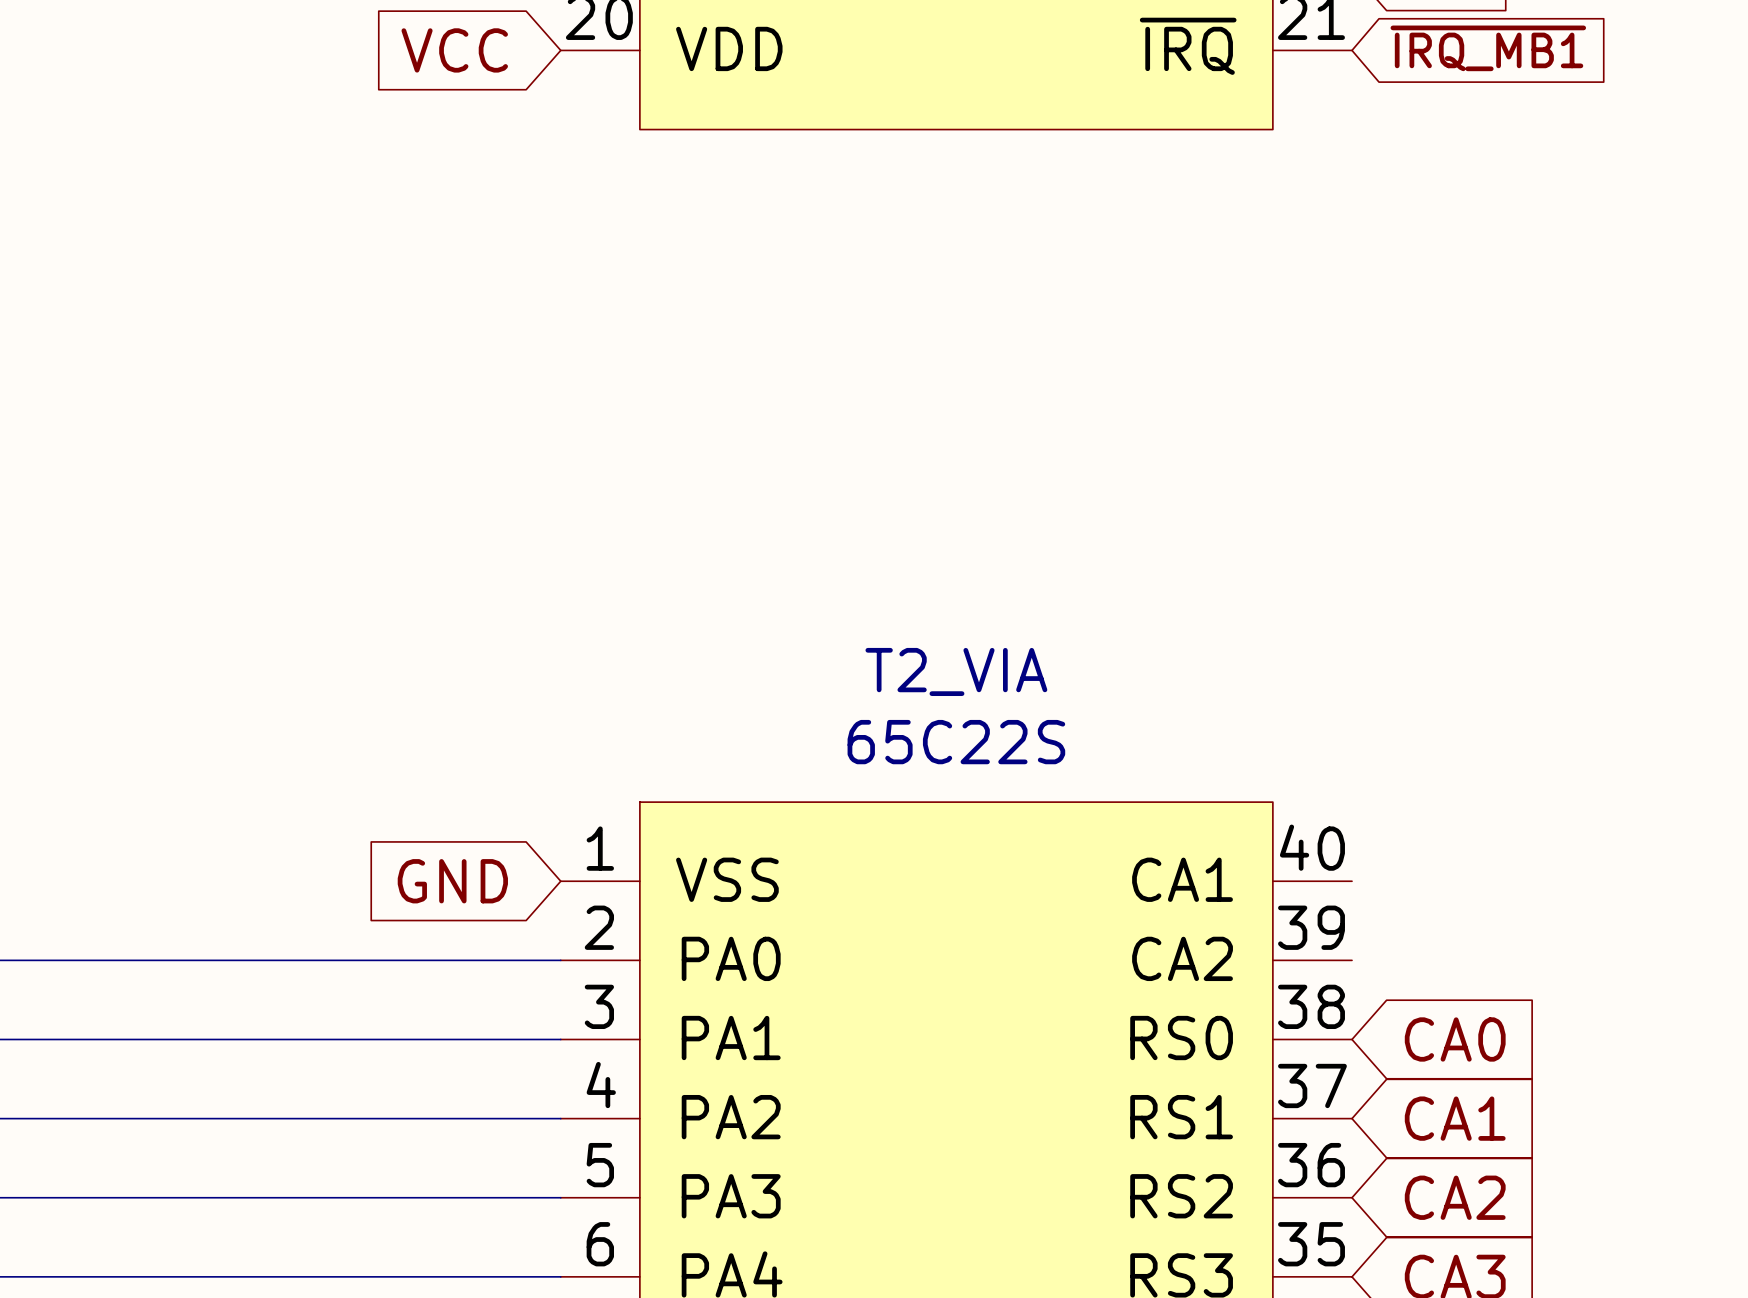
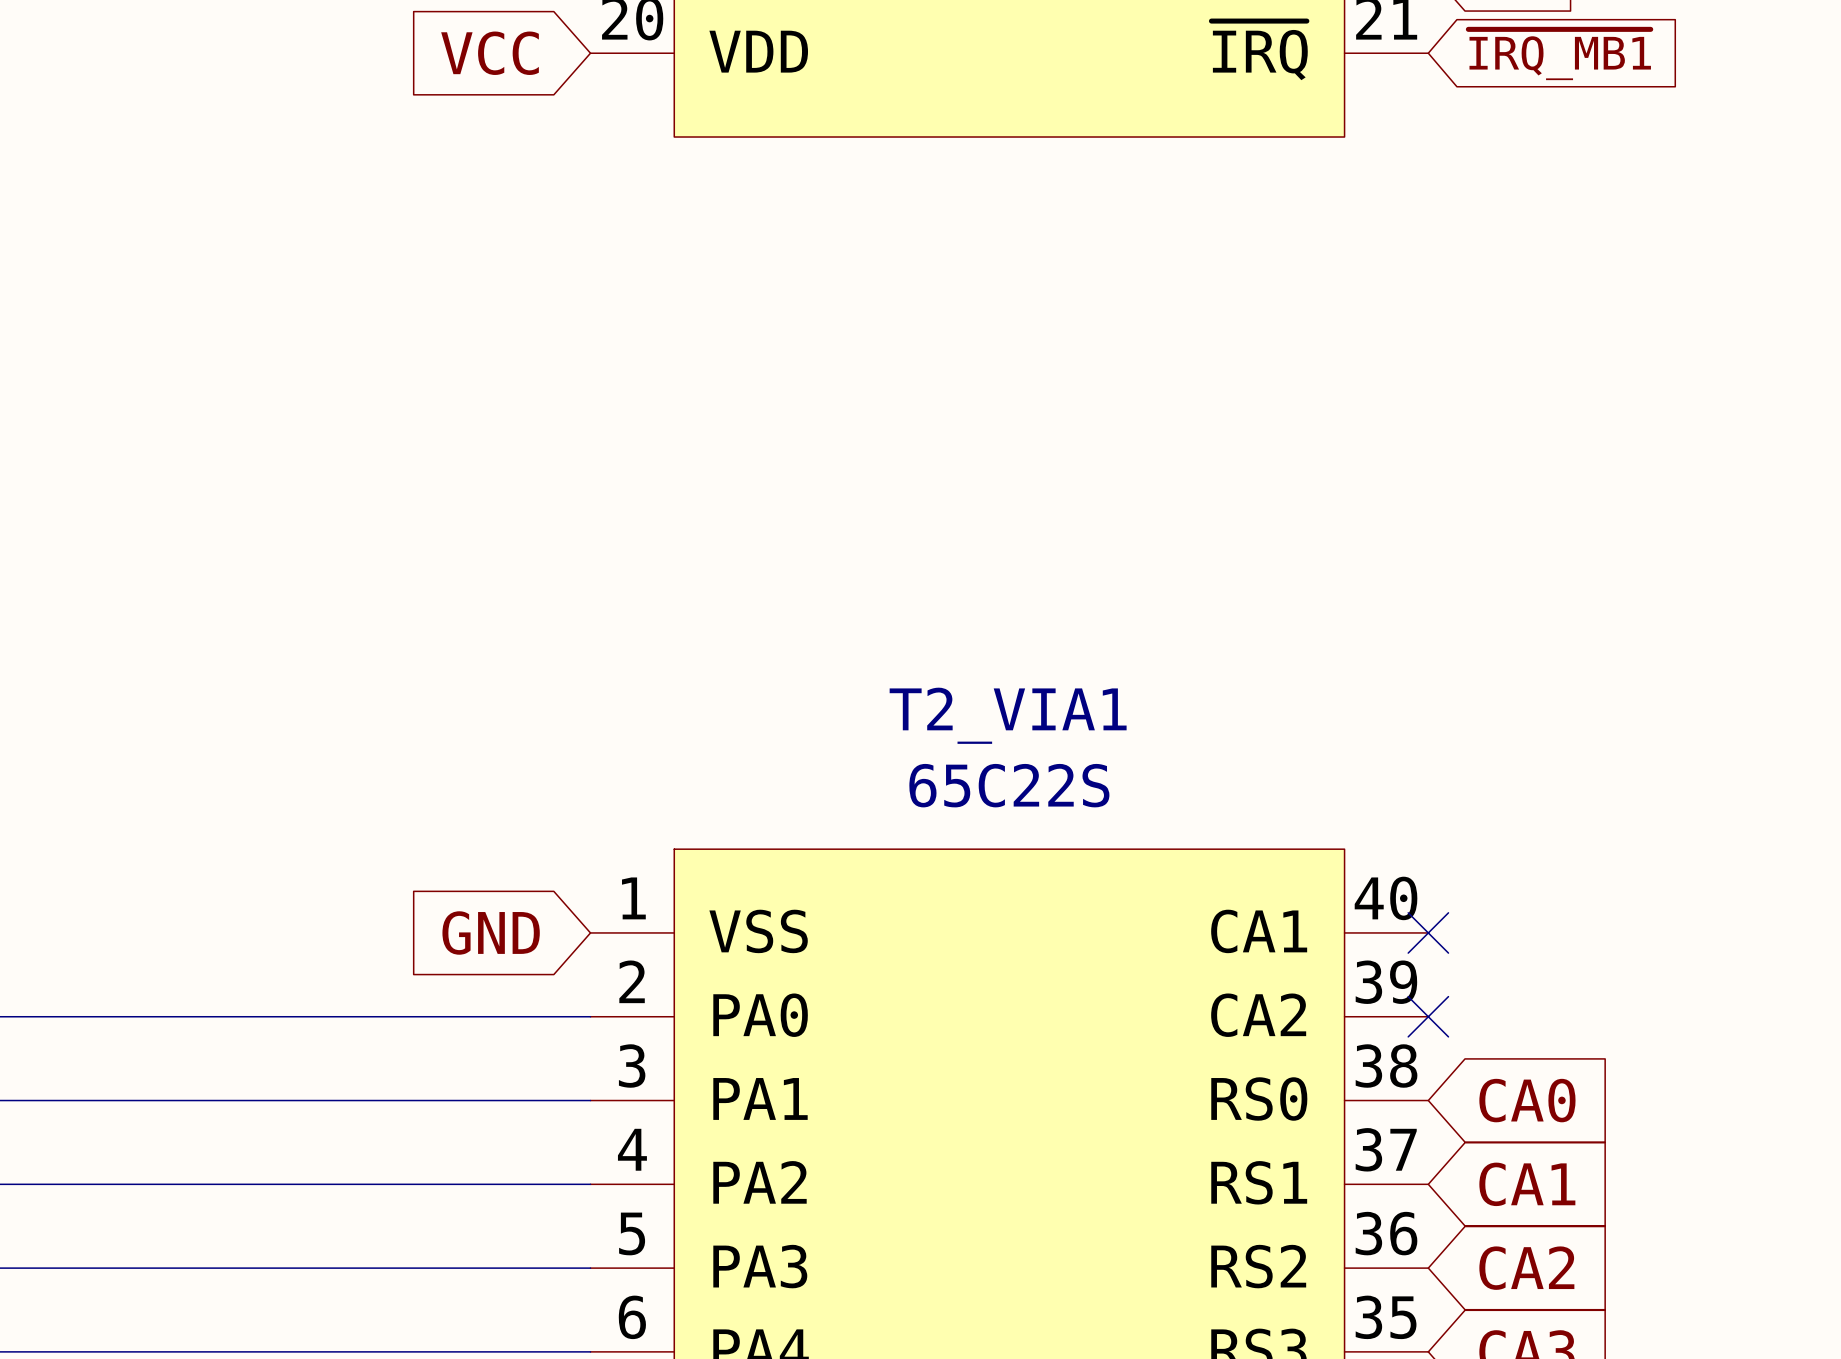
T2_VIA name: T2_VIA (956, 671) -> T2_VIA1 (1008, 715)
no-connect mark: none -> (1428, 932)
no-connect mark: none -> (1428, 1016)

